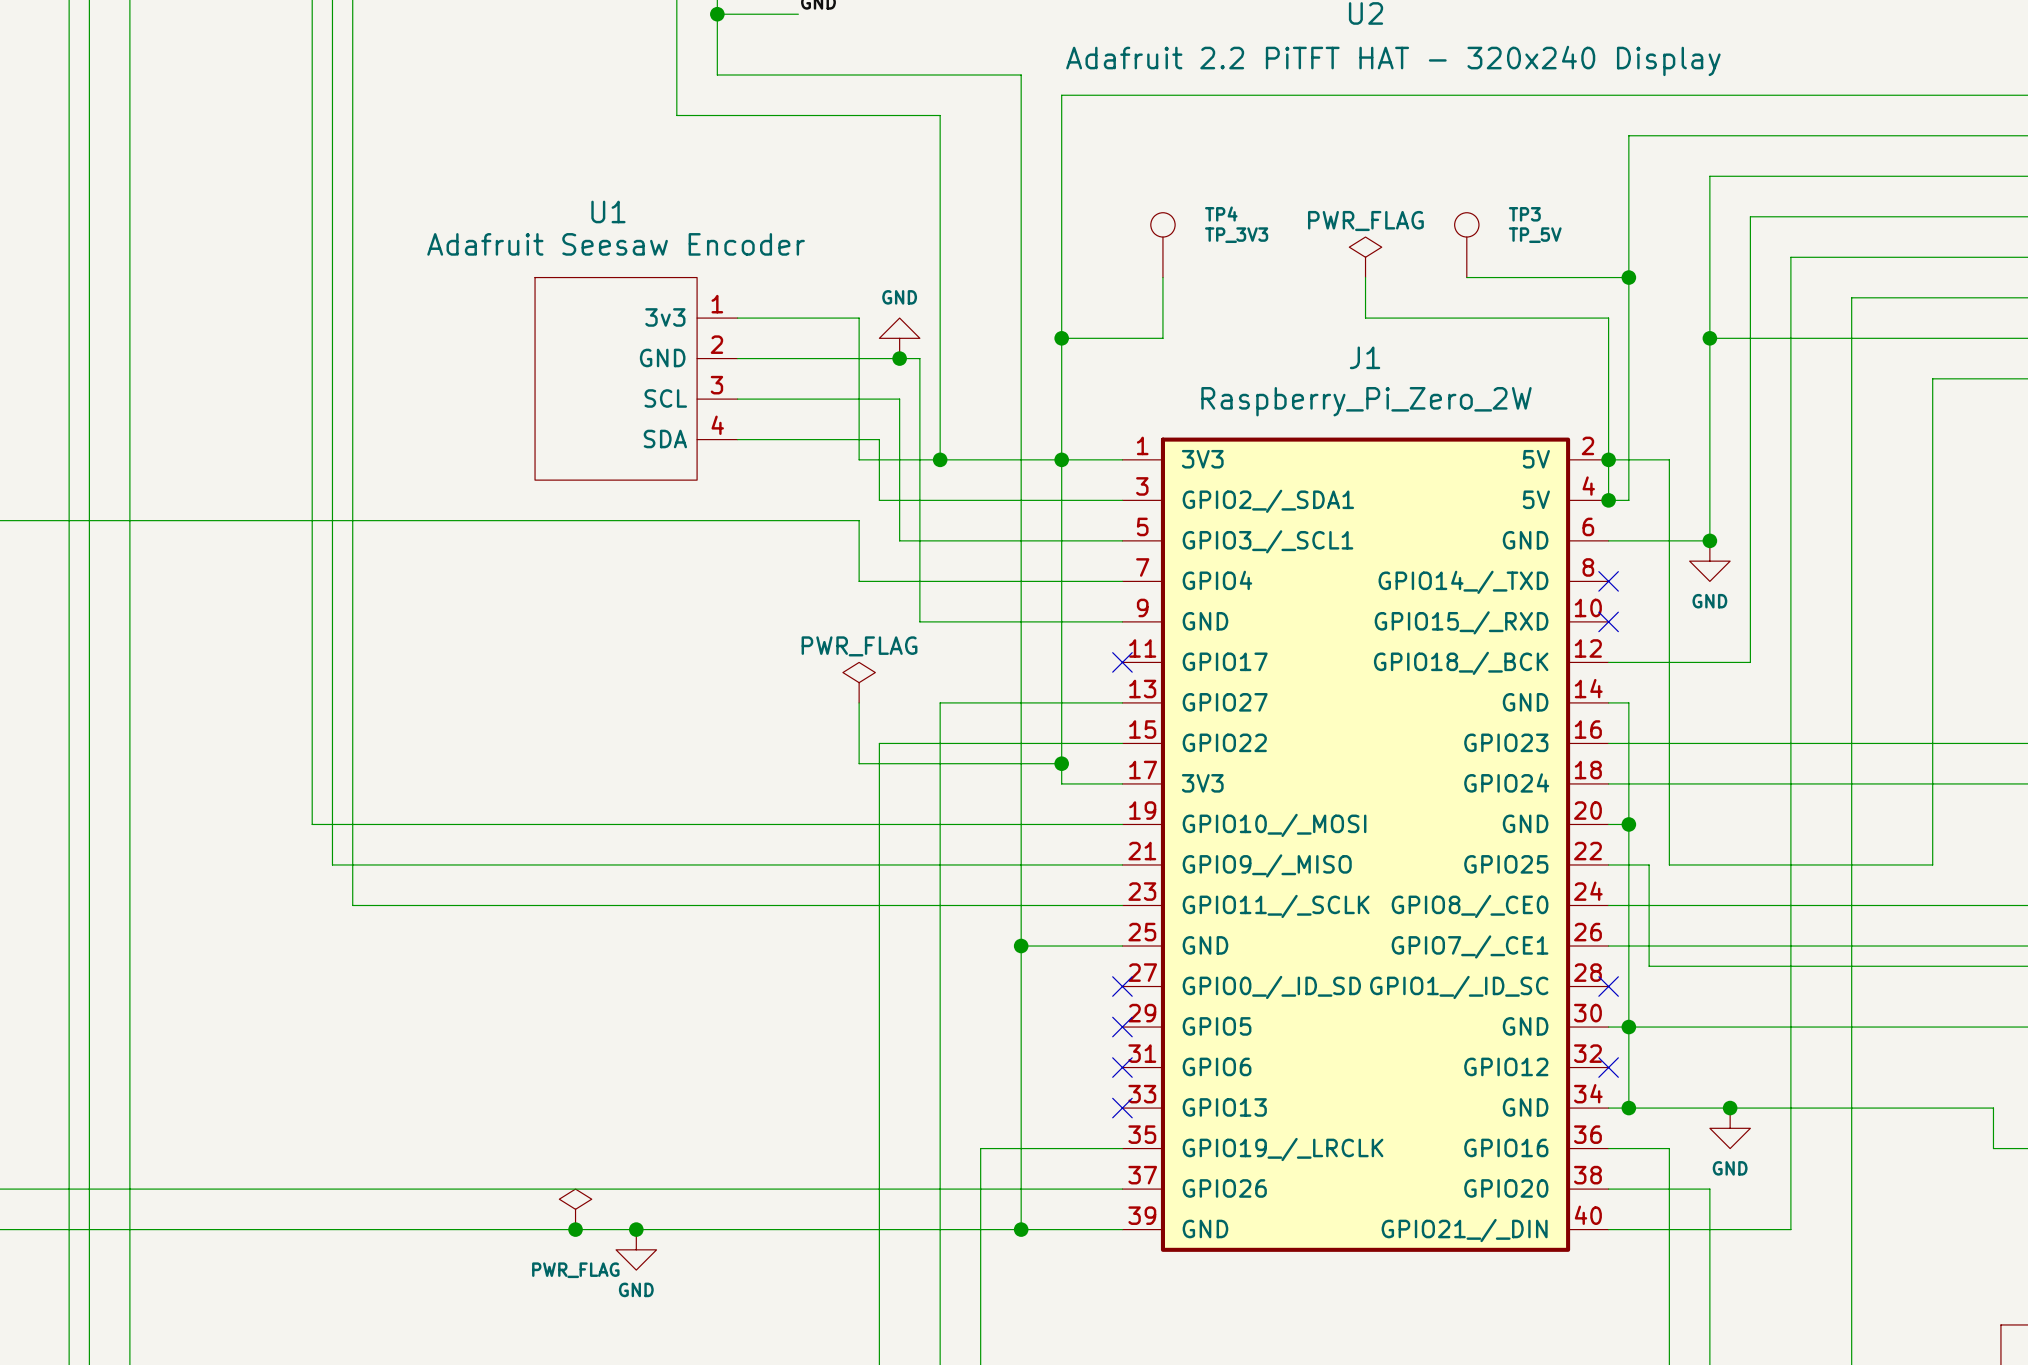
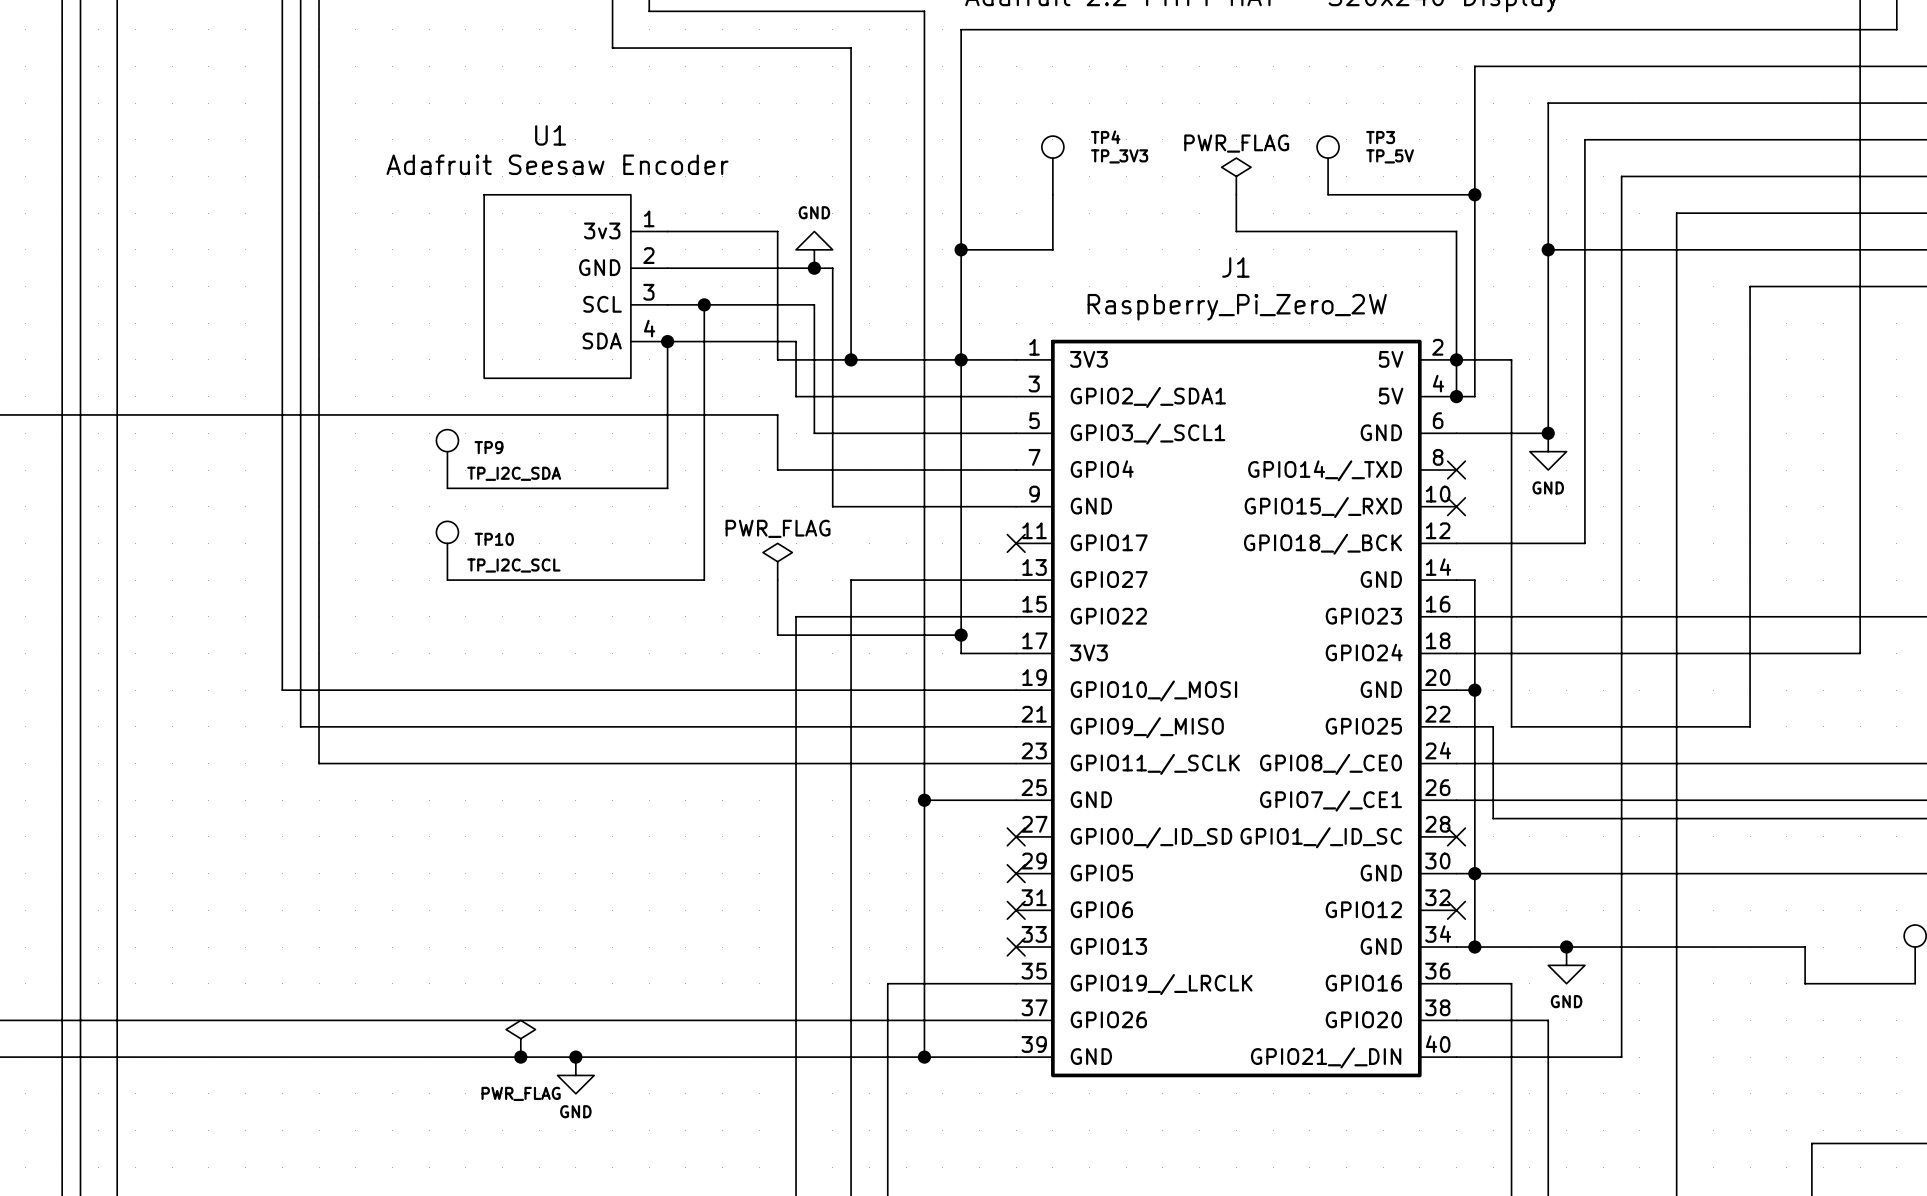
wire: none -> (704, 304) (704, 580) (447, 580)
junction: none -> (704, 304)
wire: none -> (667, 341) (667, 488) (447, 488)
junction: none -> (667, 341)
TP9: none -> TP_I2C_SDA (447, 458)
TP10: none -> TP_I2C_SCL (447, 550)

